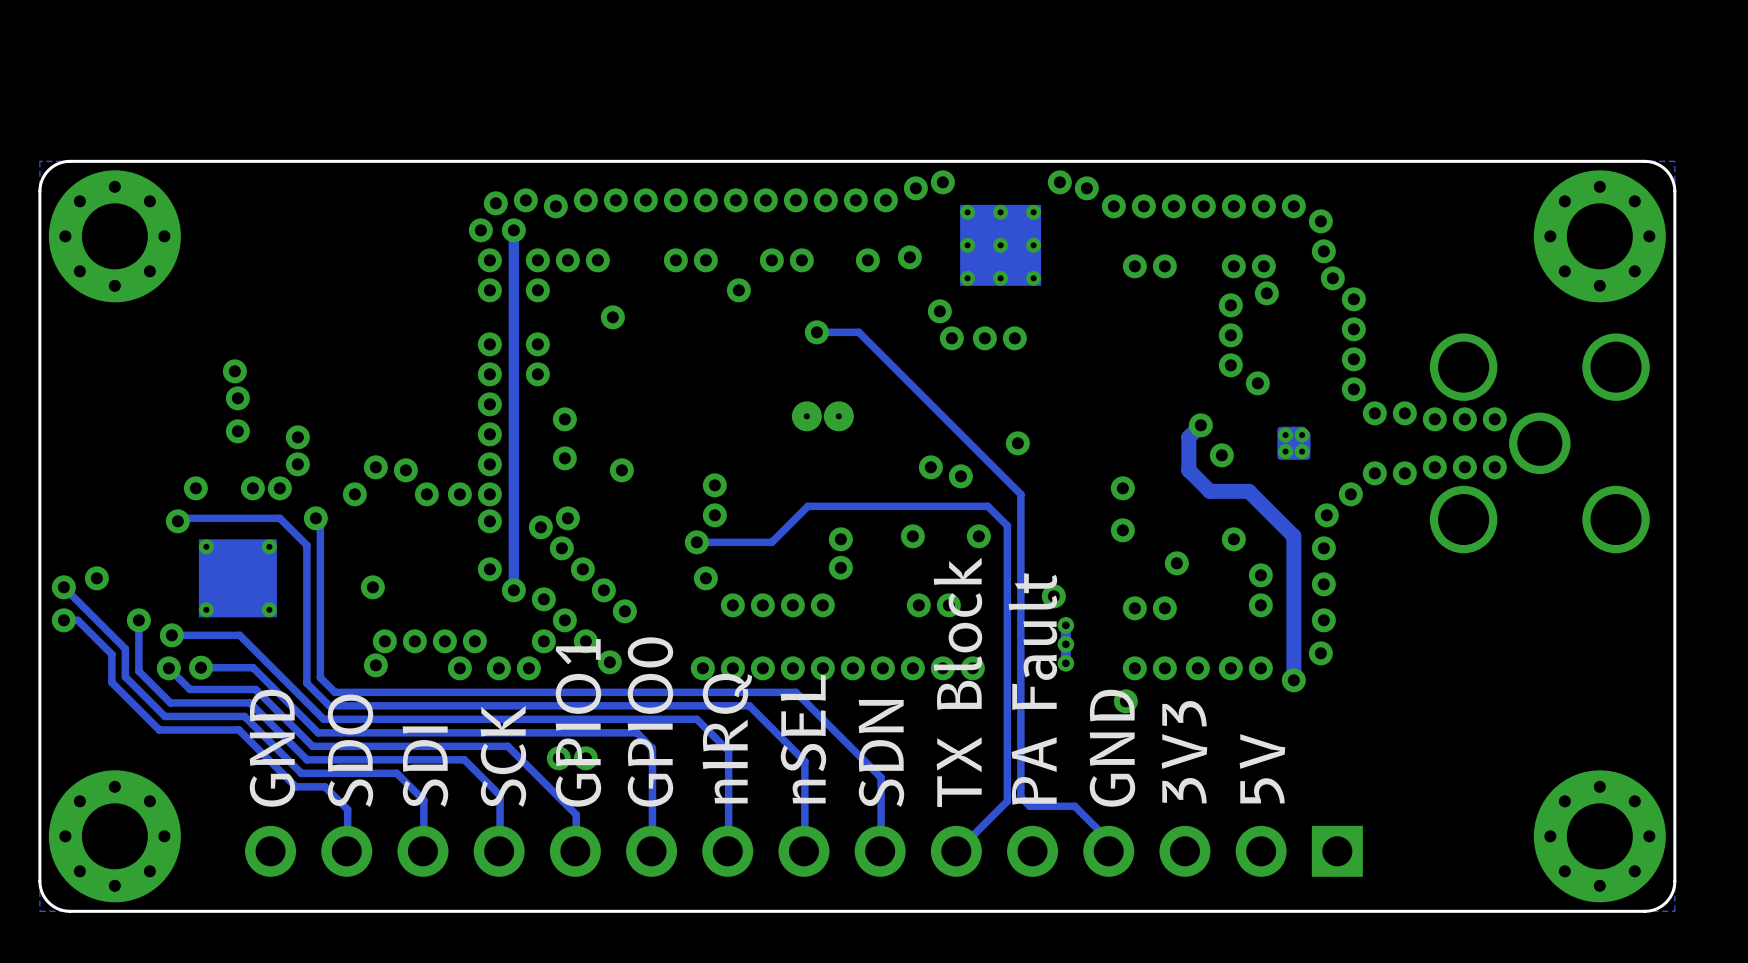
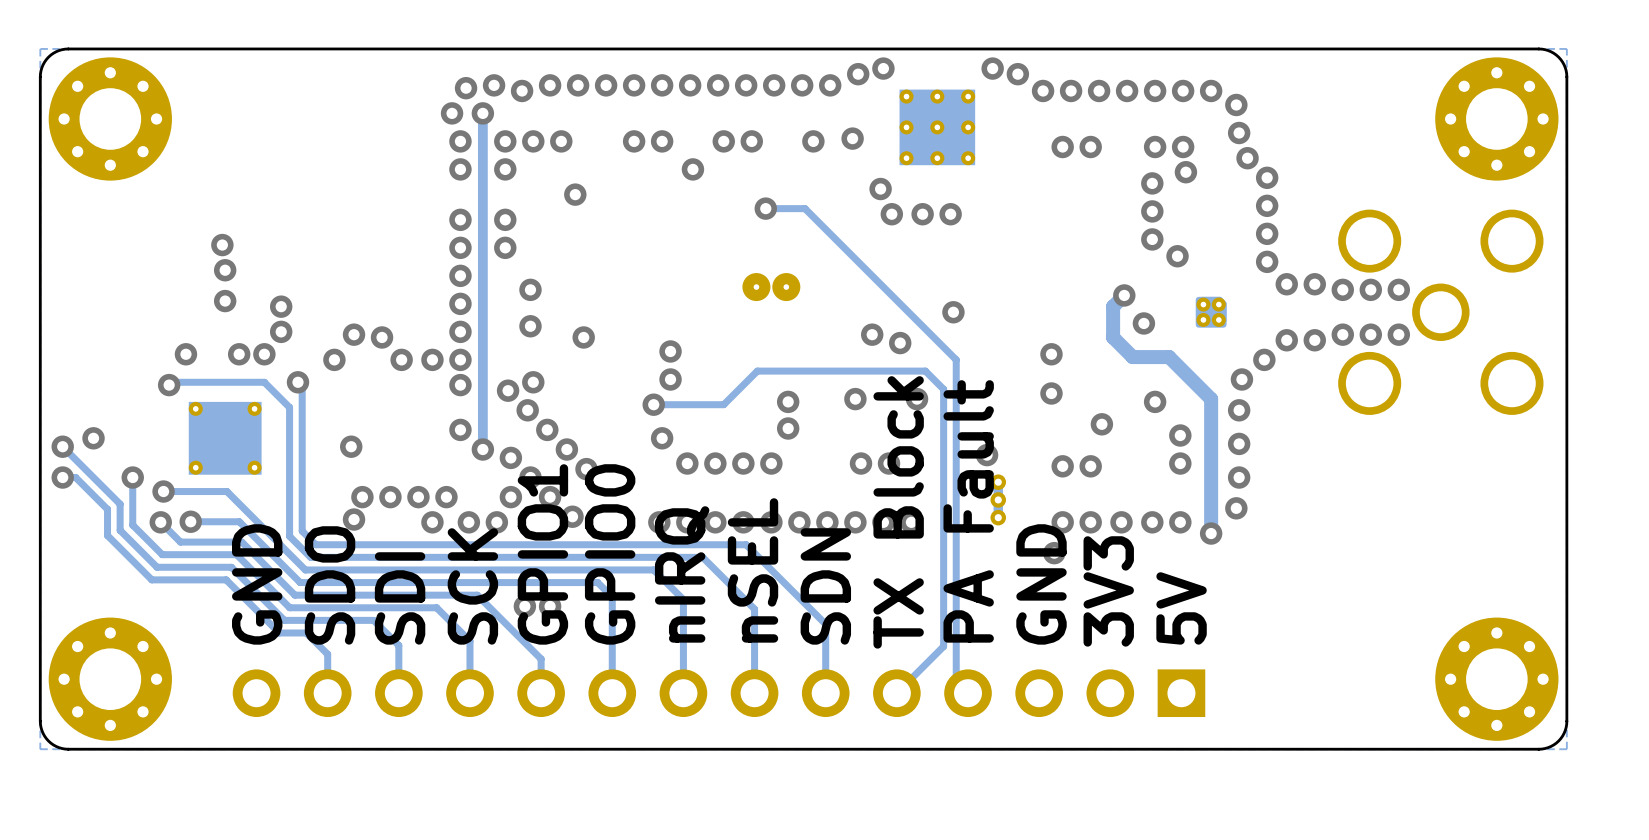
track: (1020, 797) (1029, 806) (1074, 806) (1108, 840) (1108, 851) -> (956, 642) (956, 681) (968, 693)
part: none -> (718, 693)
part: (803, 851) -> none

